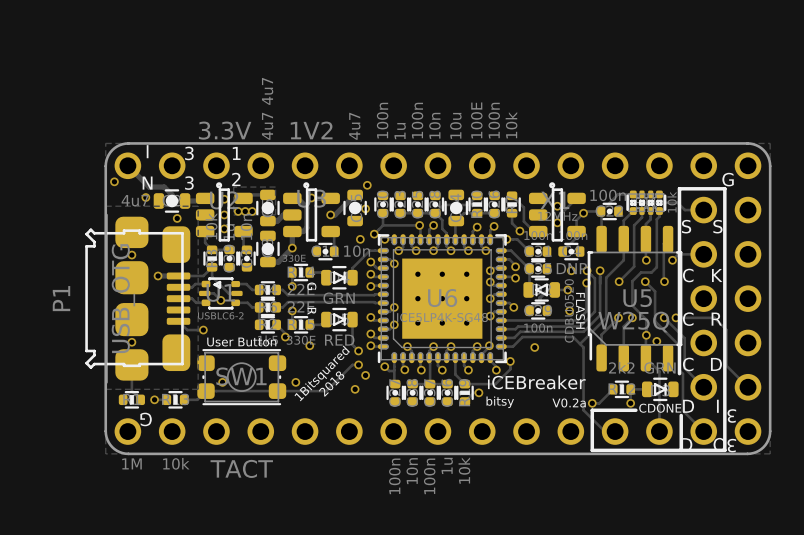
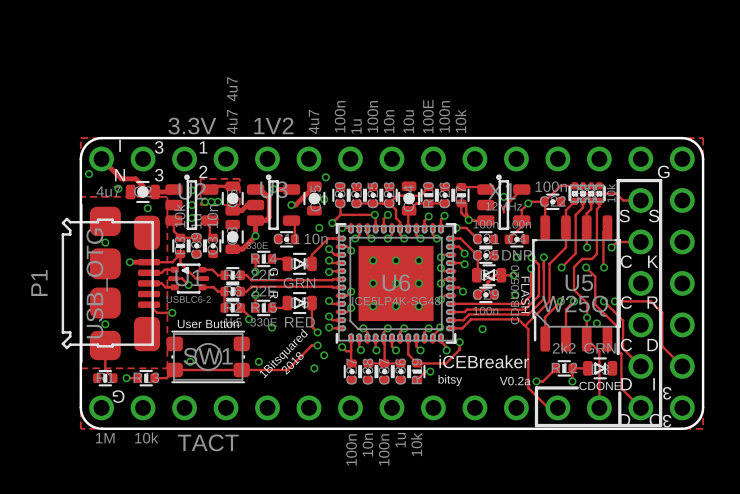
track: (512, 195) (523, 207) (523, 221) (533, 231) -> (466, 203) (466, 213) (472, 220) (481, 220)
track: none -> (466, 187) (483, 187) (485, 189)
via: (557, 222) -> none

